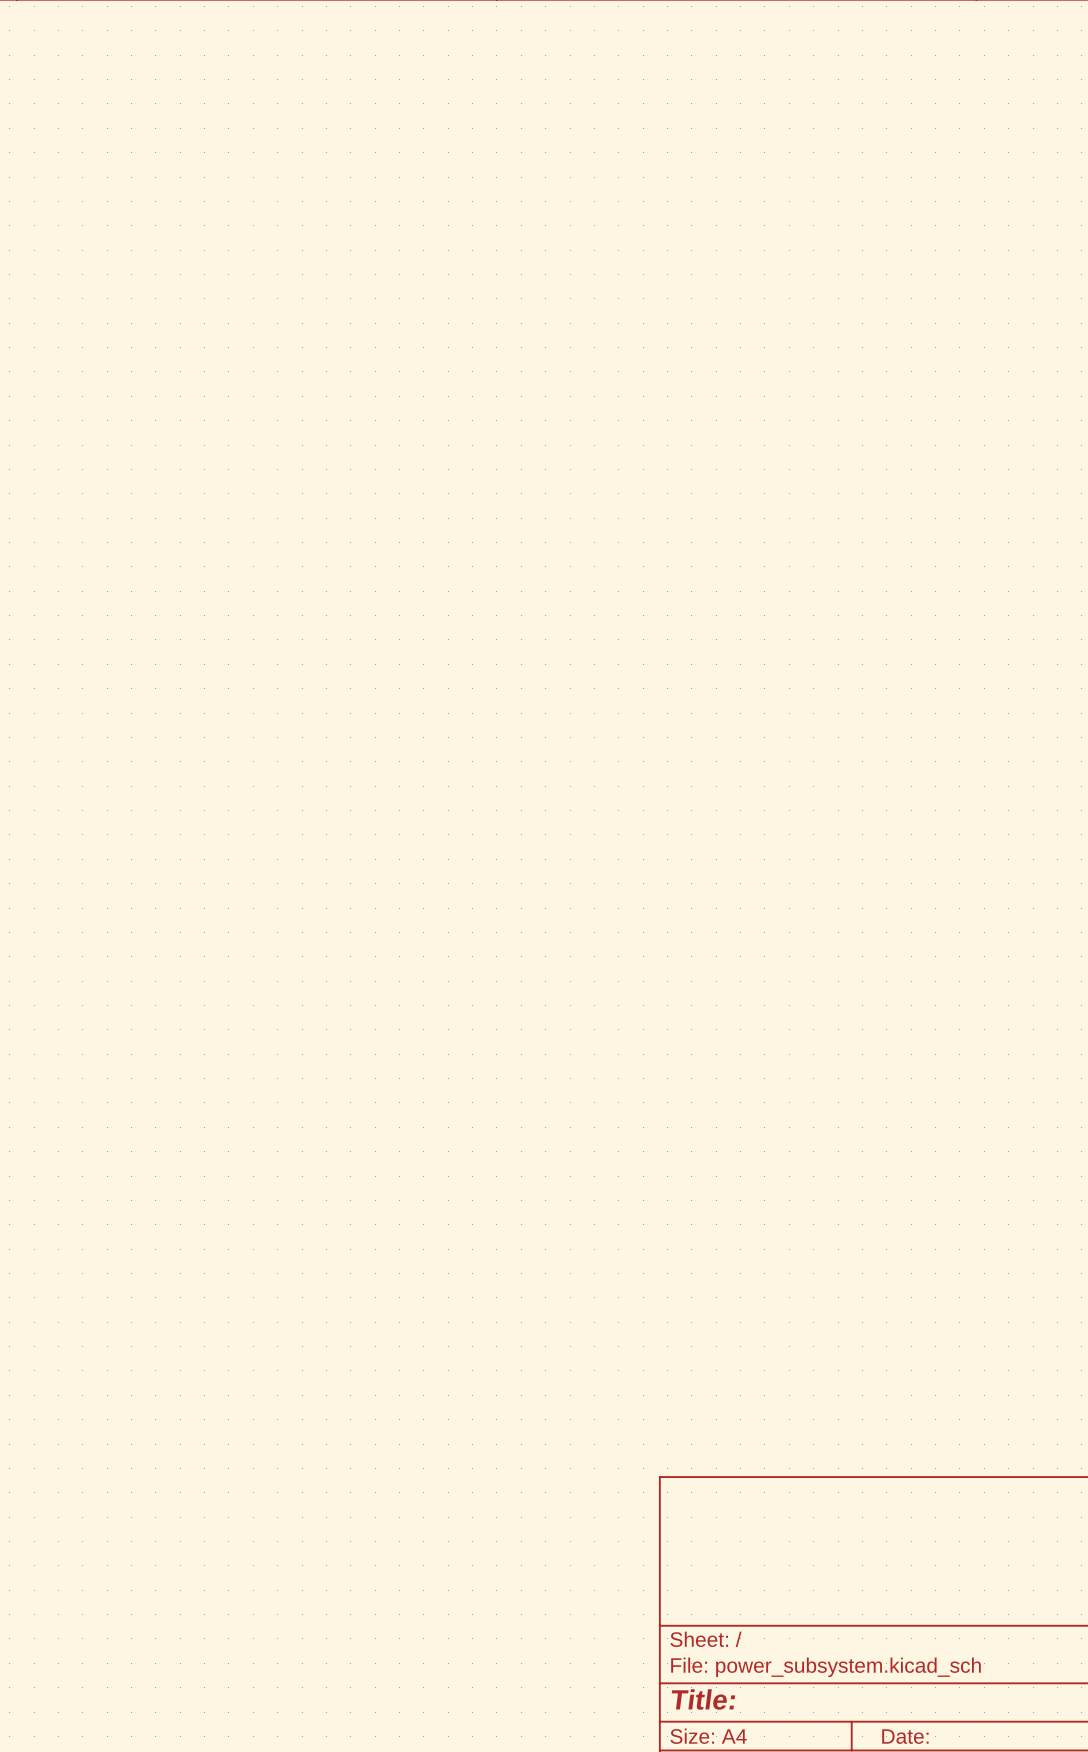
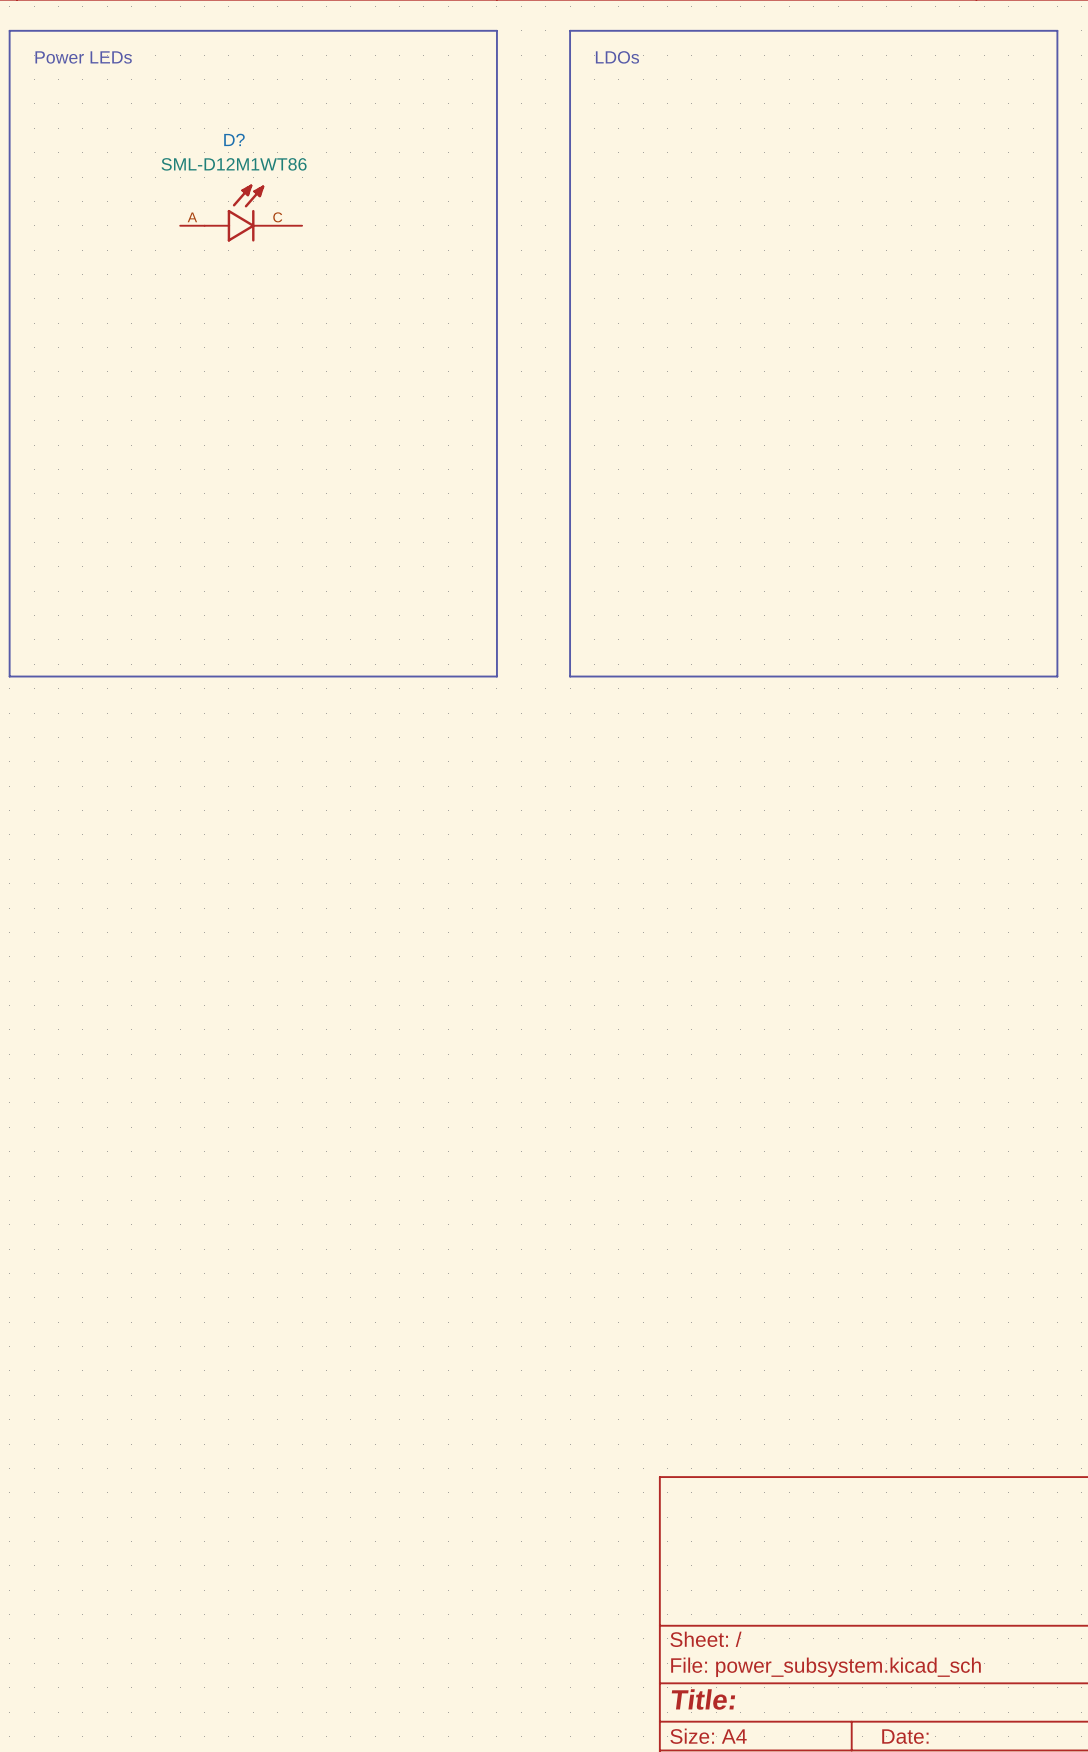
line: none -> (9, 30) (496, 30) (496, 676) (9, 676) (9, 30)
line: none -> (570, 30) (1057, 30) (1057, 676) (570, 676) (570, 30)
text: none -> Power LEDs (83, 57)
text: none -> LDOs (617, 57)
D?: none -> SML-D12M1WT86 (241, 213)

